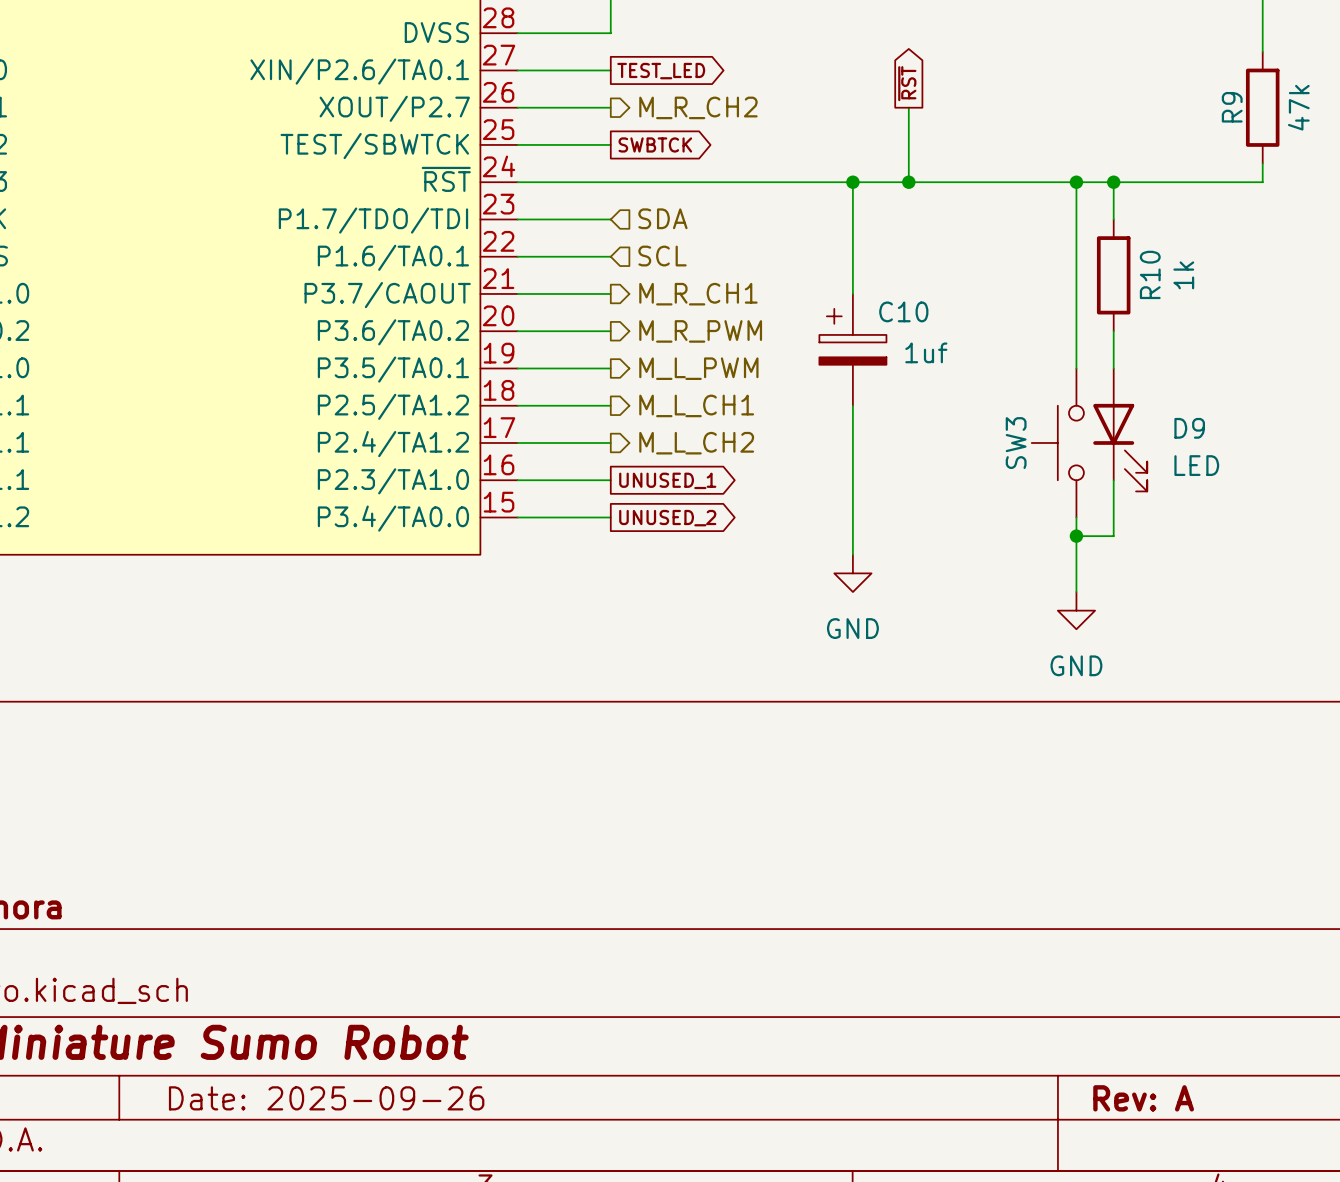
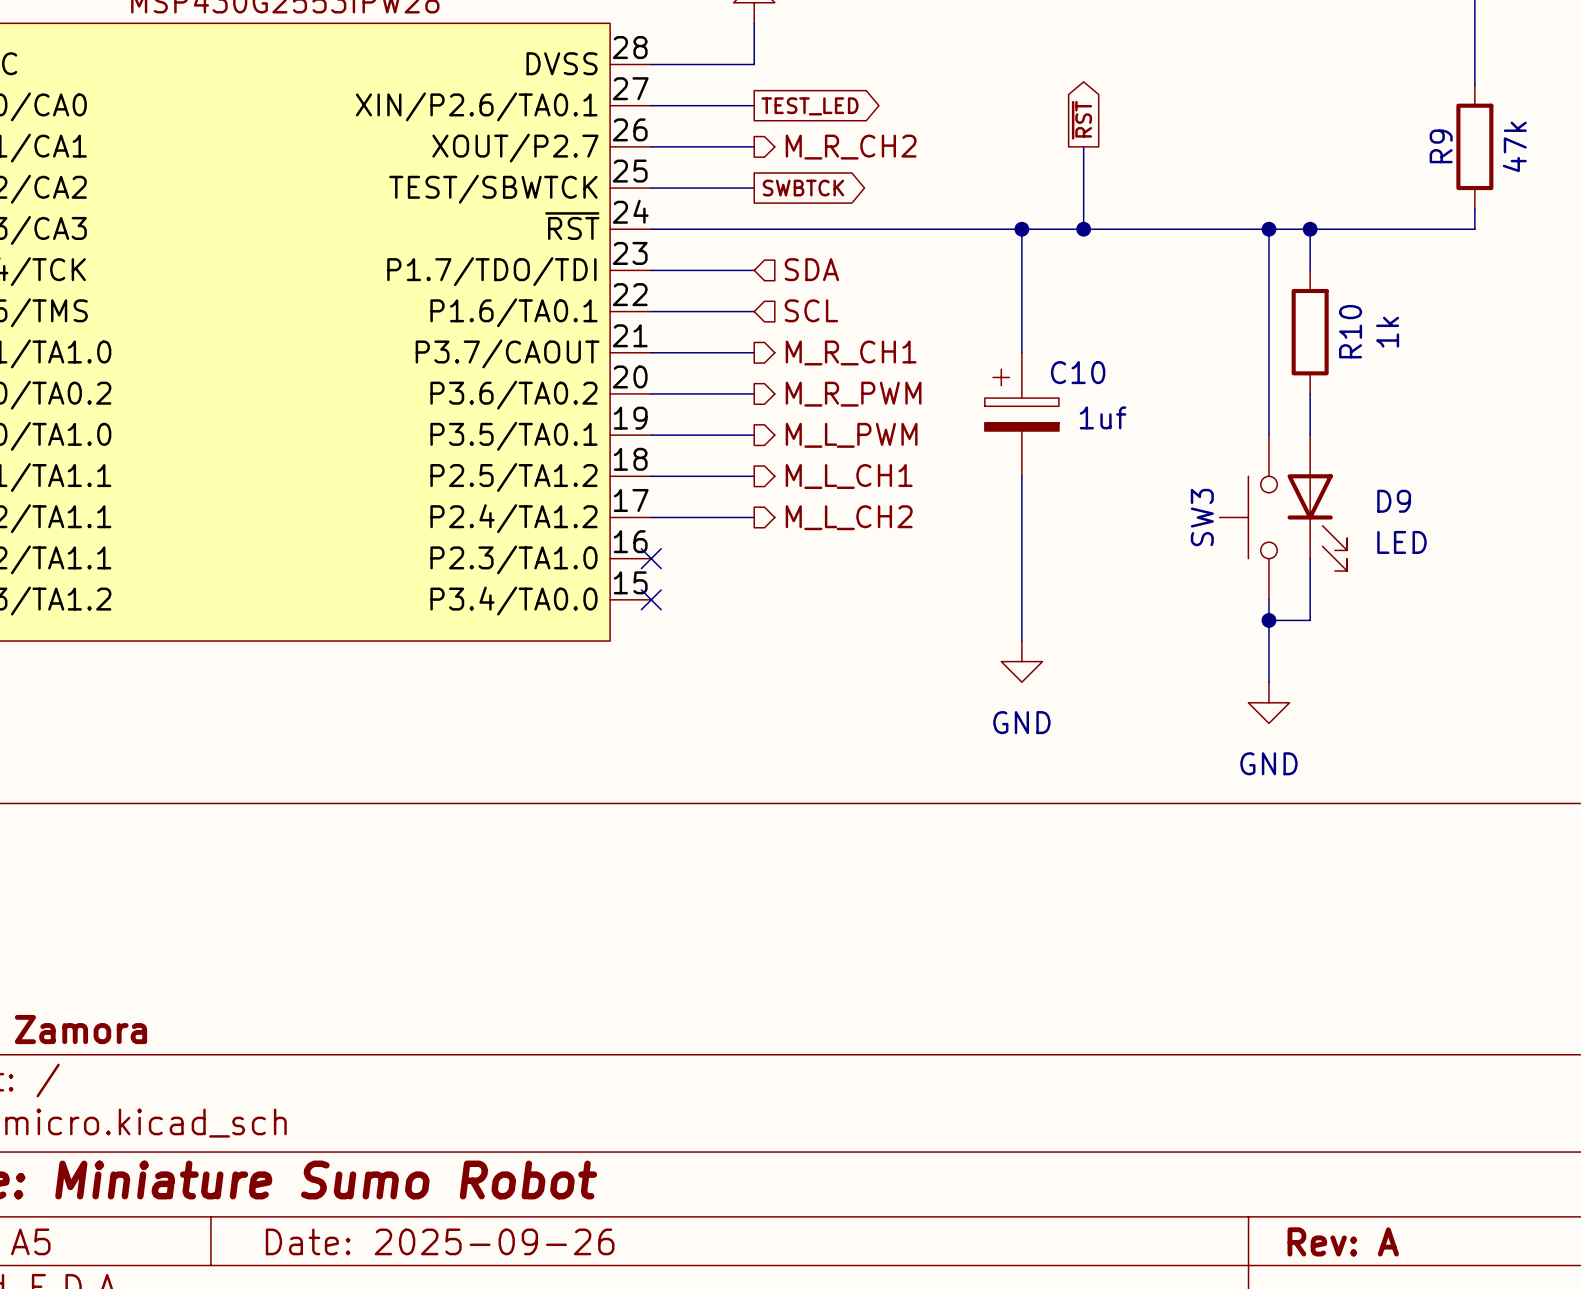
wire: (517, 480) (610, 480) -> none
no-connect mark: none -> (651, 558)
global label: UNUSED_1 (667, 480) -> none
wire: (517, 517) (610, 517) -> none
no-connect mark: none -> (651, 599)
global label: UNUSED_2 (667, 518) -> none

